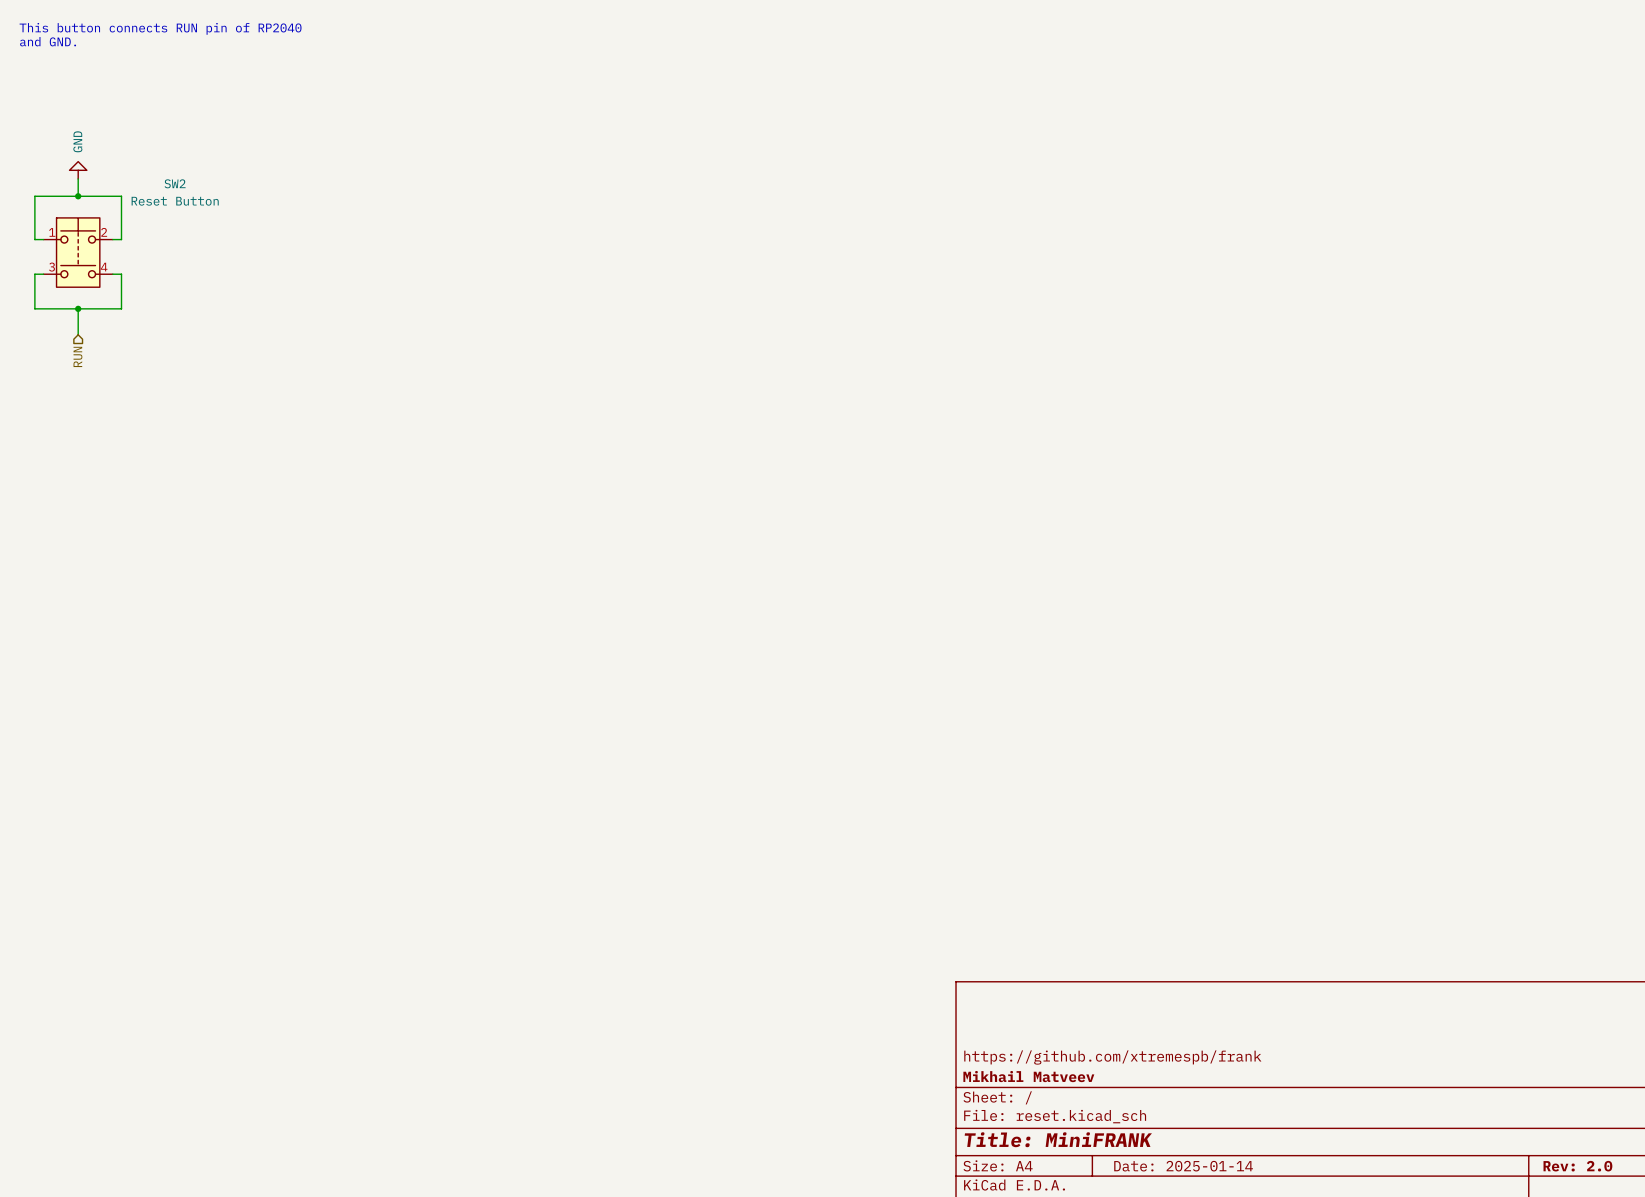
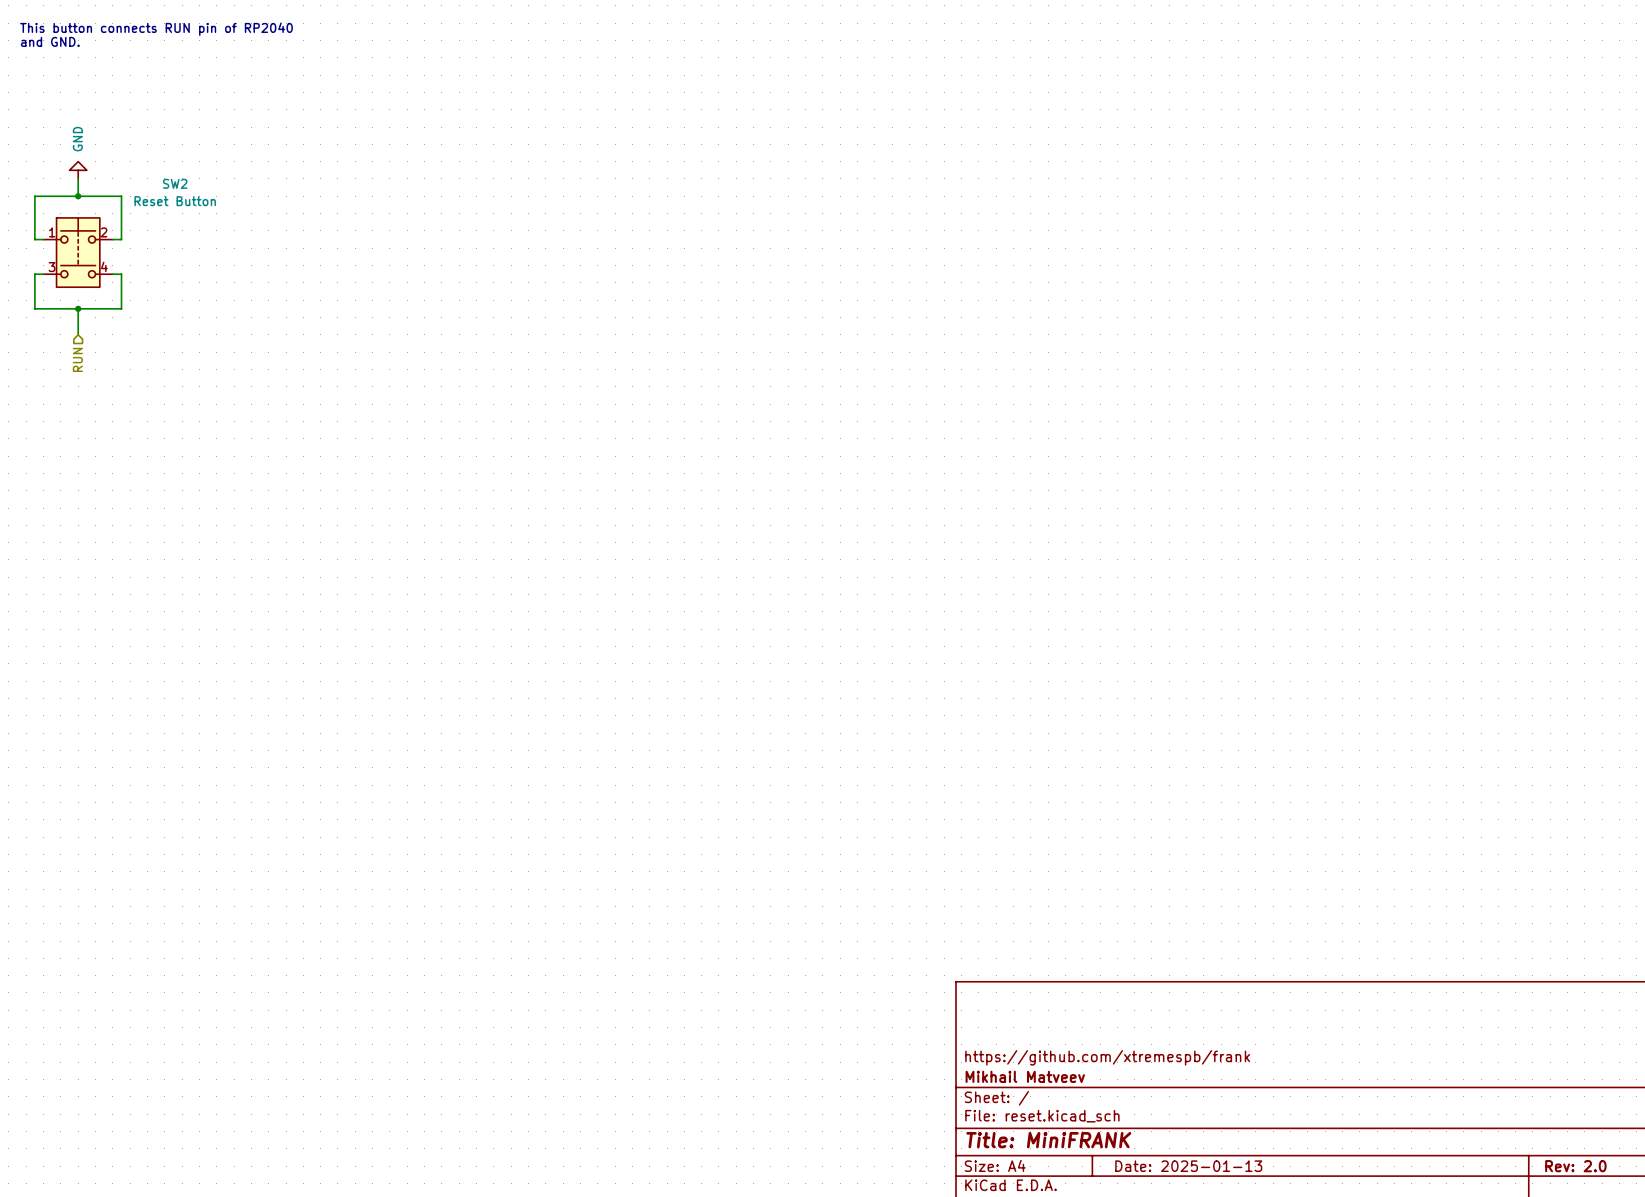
title block: Date: 2025-01-14 (1183, 1166) -> Date: 2025-01-13 (1188, 1166)

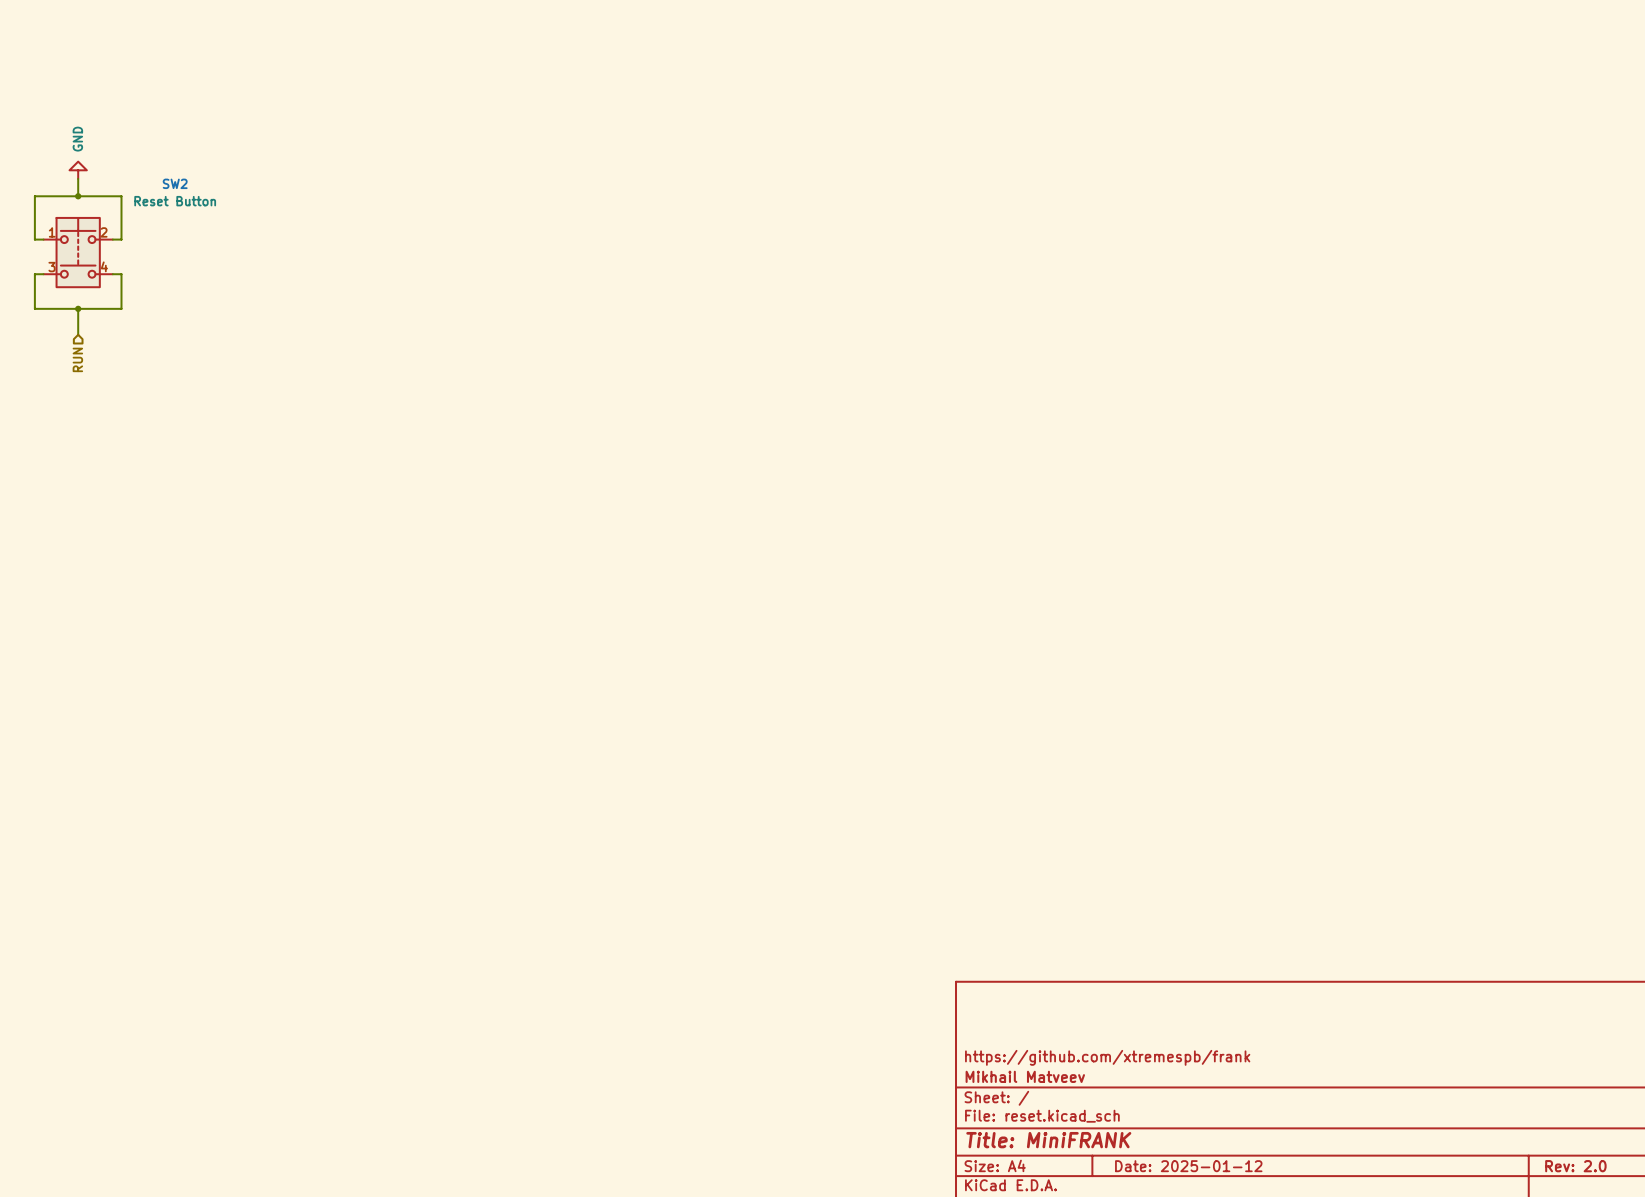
text: This button connects RUN pin of RP2040 (156, 29) -> none
text: and GND. (50, 41) -> none
title block: Date: 2025-01-13 (1188, 1166) -> Date: 2025-01-12 (1188, 1166)

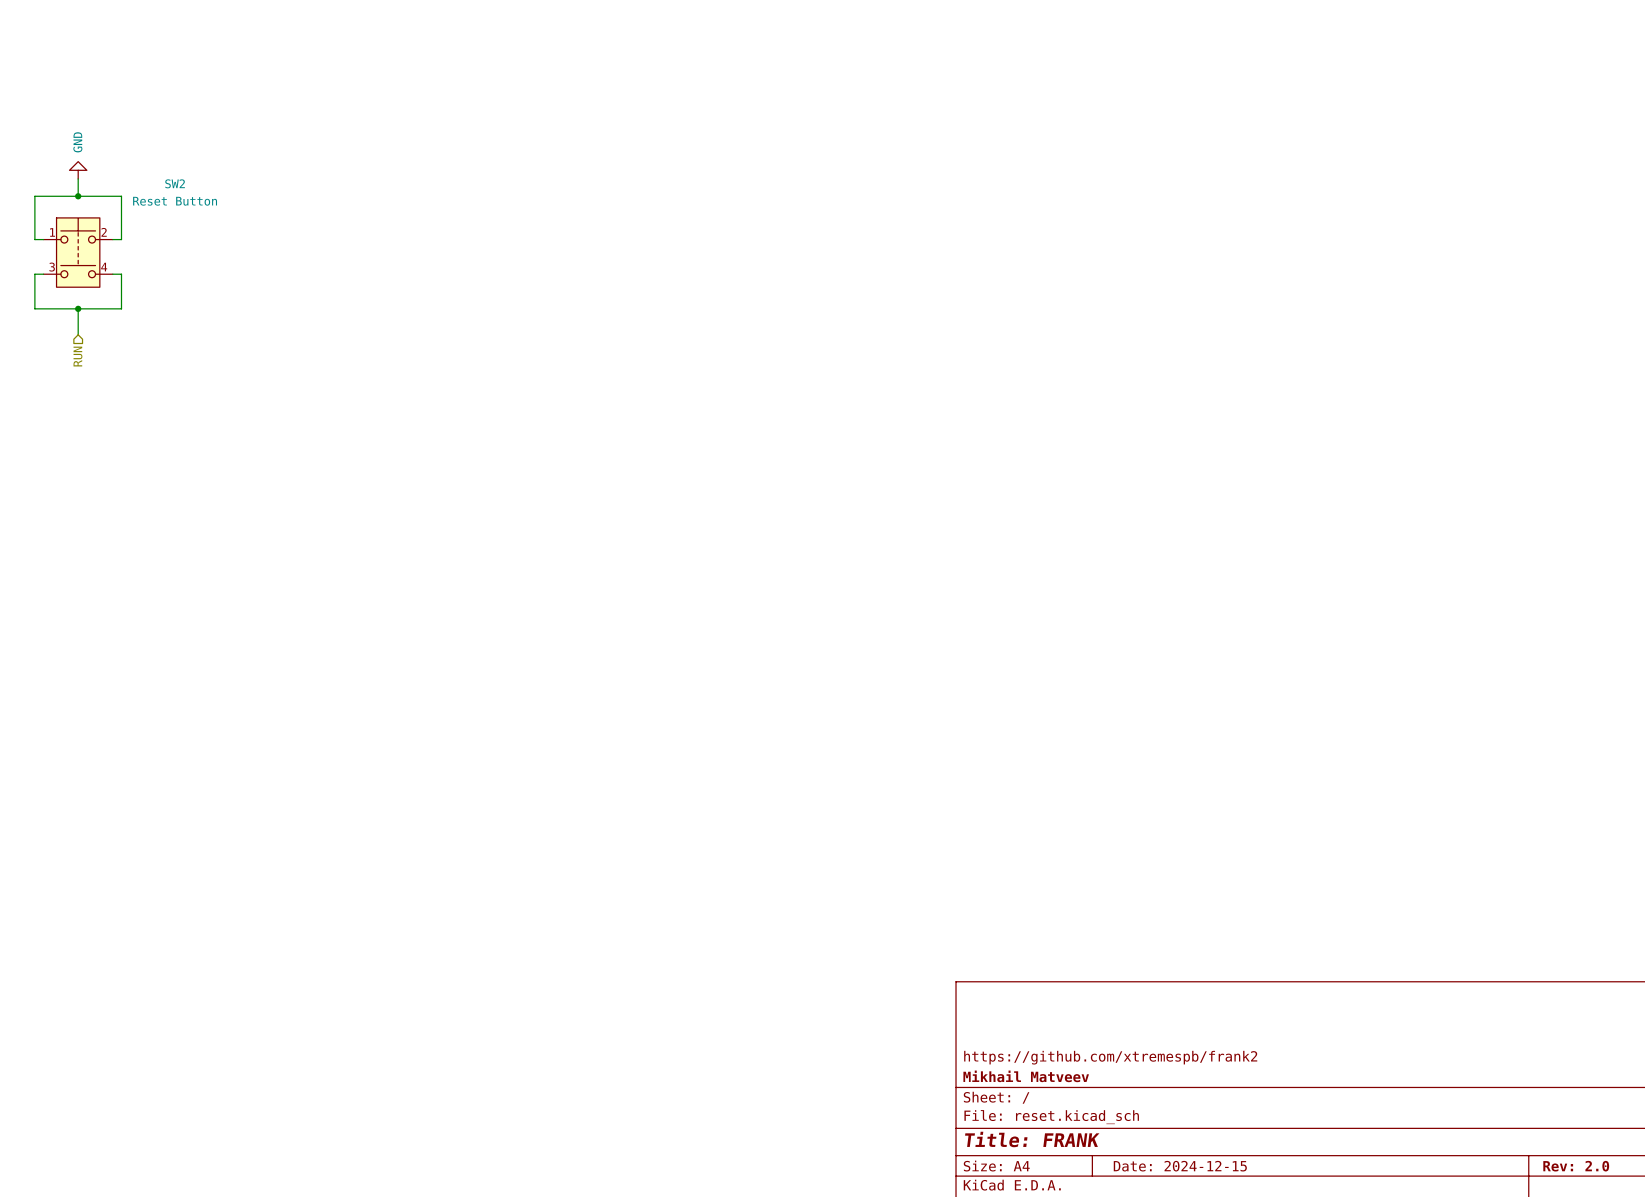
title block: https://github.com/xtremespb/frank (1107, 1057) -> https://github.com/xtremespb/frank2 (1110, 1057)
title block: Title: MiniFRANK (1048, 1140) -> Title: FRANK (1032, 1139)
title block: Date: 2025-01-12 (1188, 1166) -> Date: 2024-12-15 (1180, 1166)

